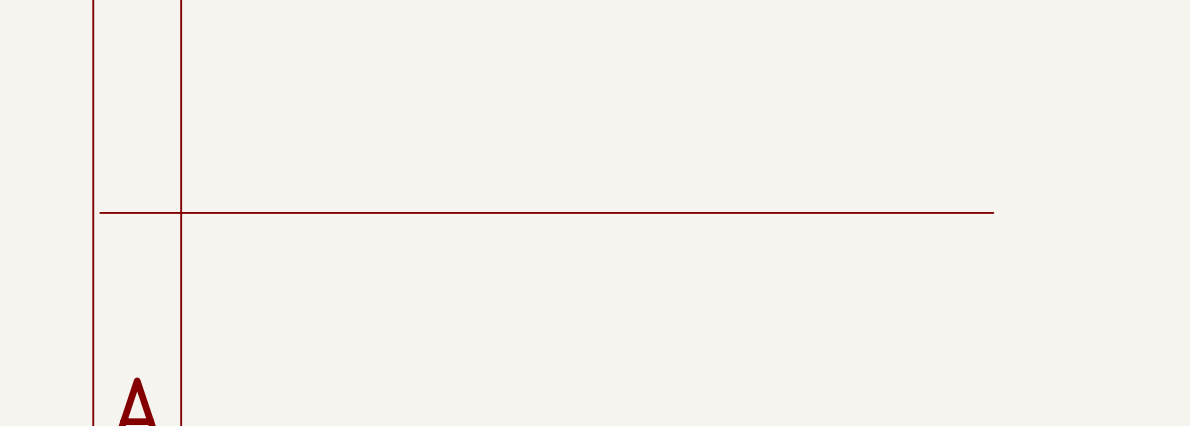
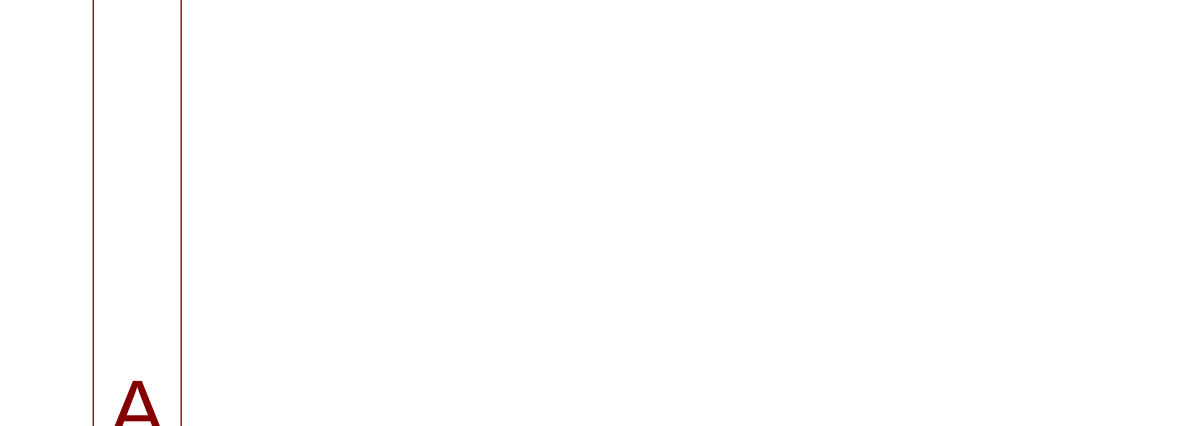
part: (546, 212) -> none

